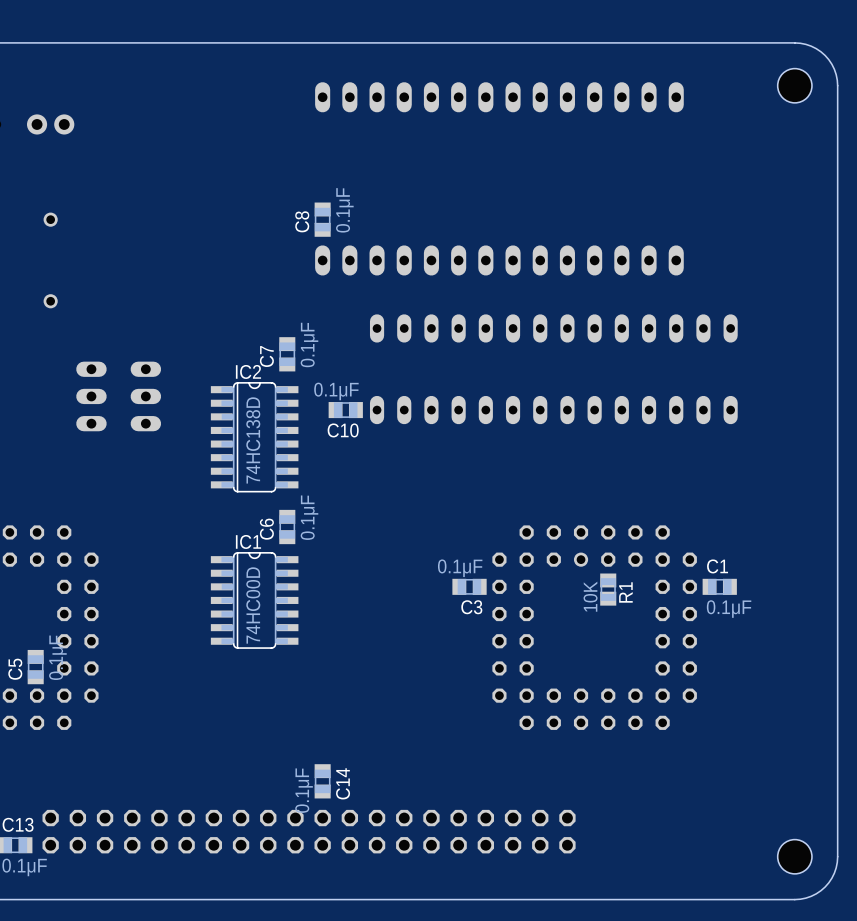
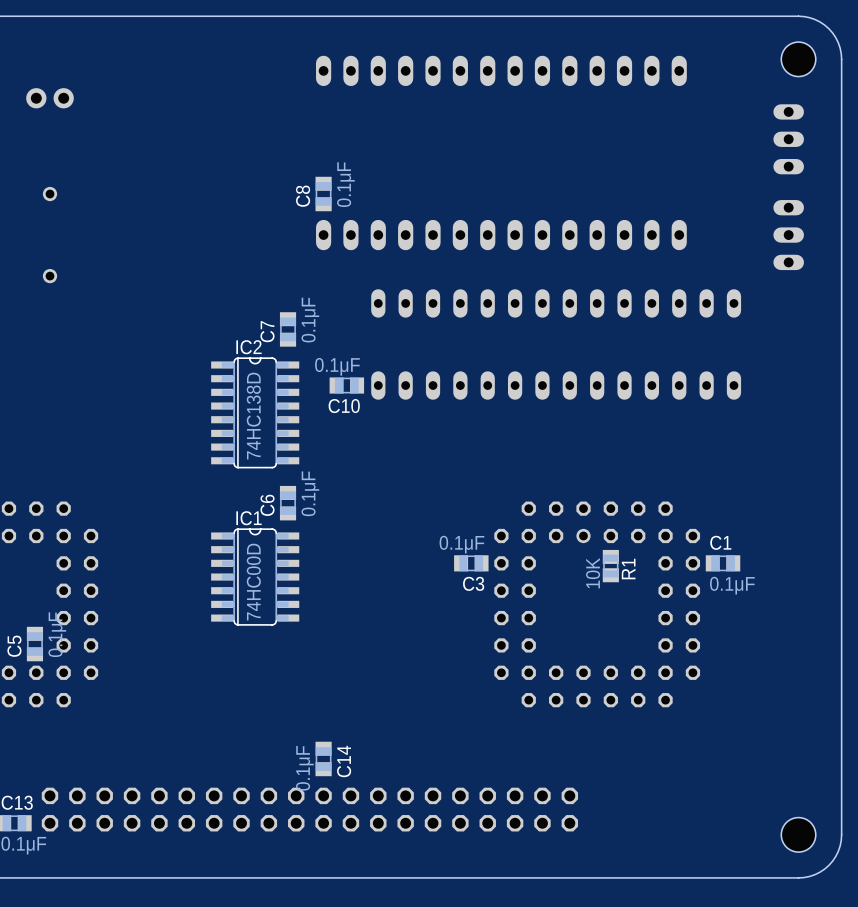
part: none -> (788, 139)
part: none -> (788, 235)
part: (91, 396) -> none
part: (145, 396) -> none

